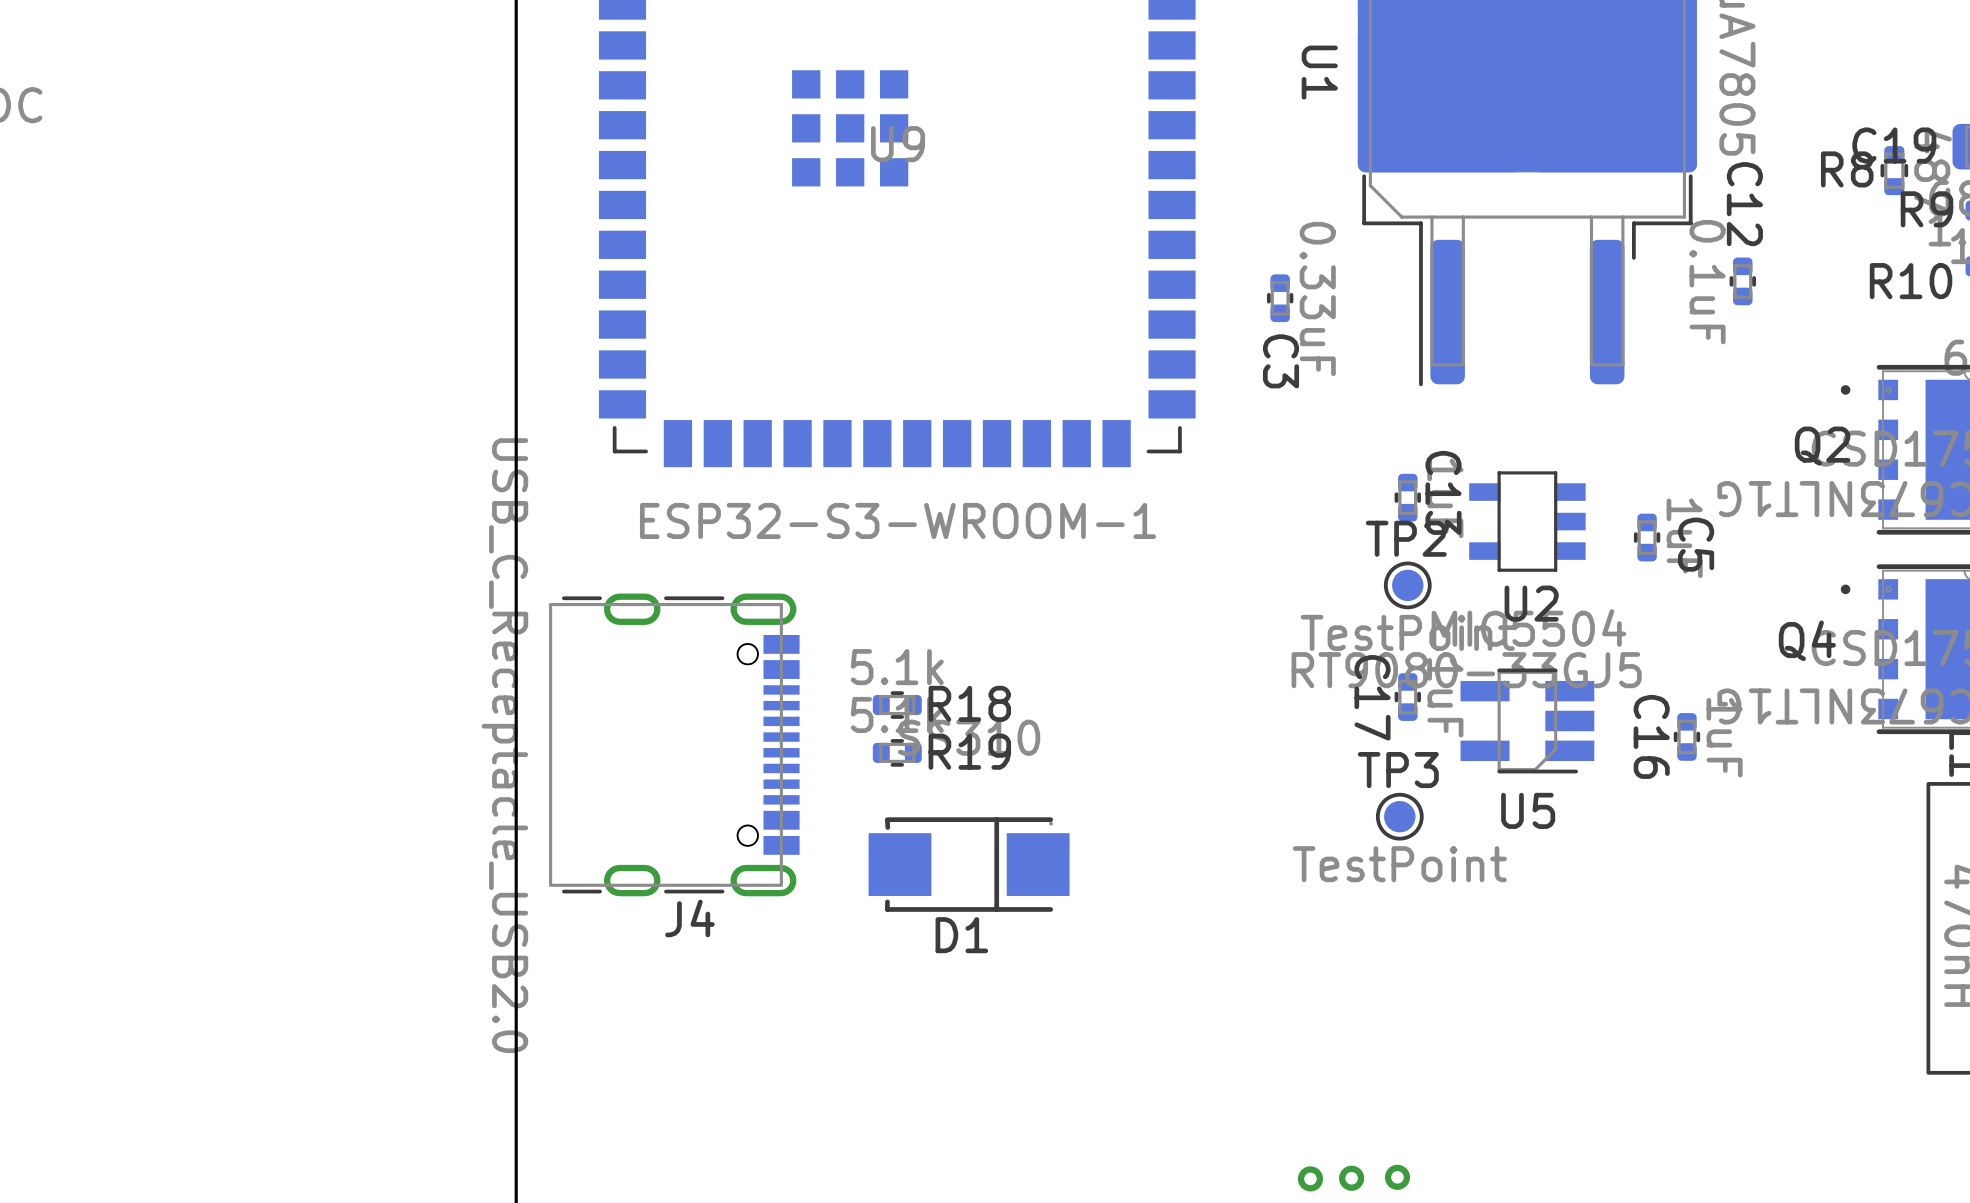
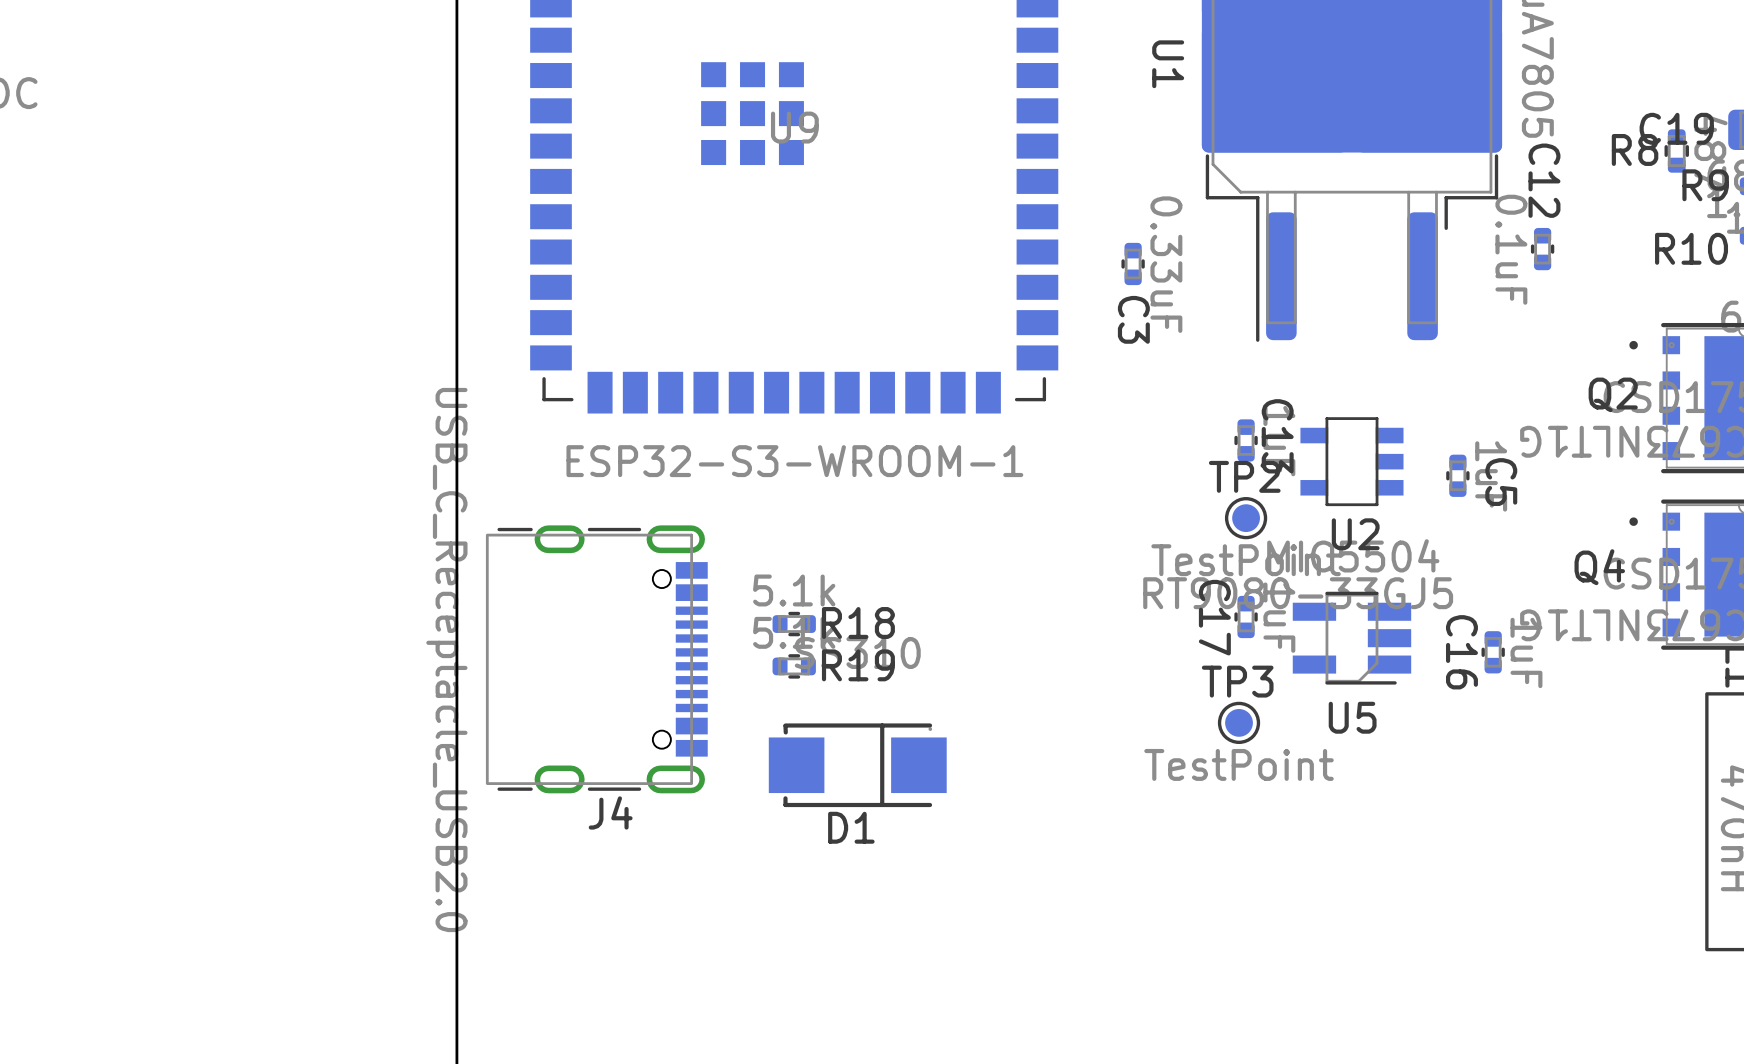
via: (1397, 1177) -> none
via: (1310, 1178) -> none
via: (1351, 1178) -> none

